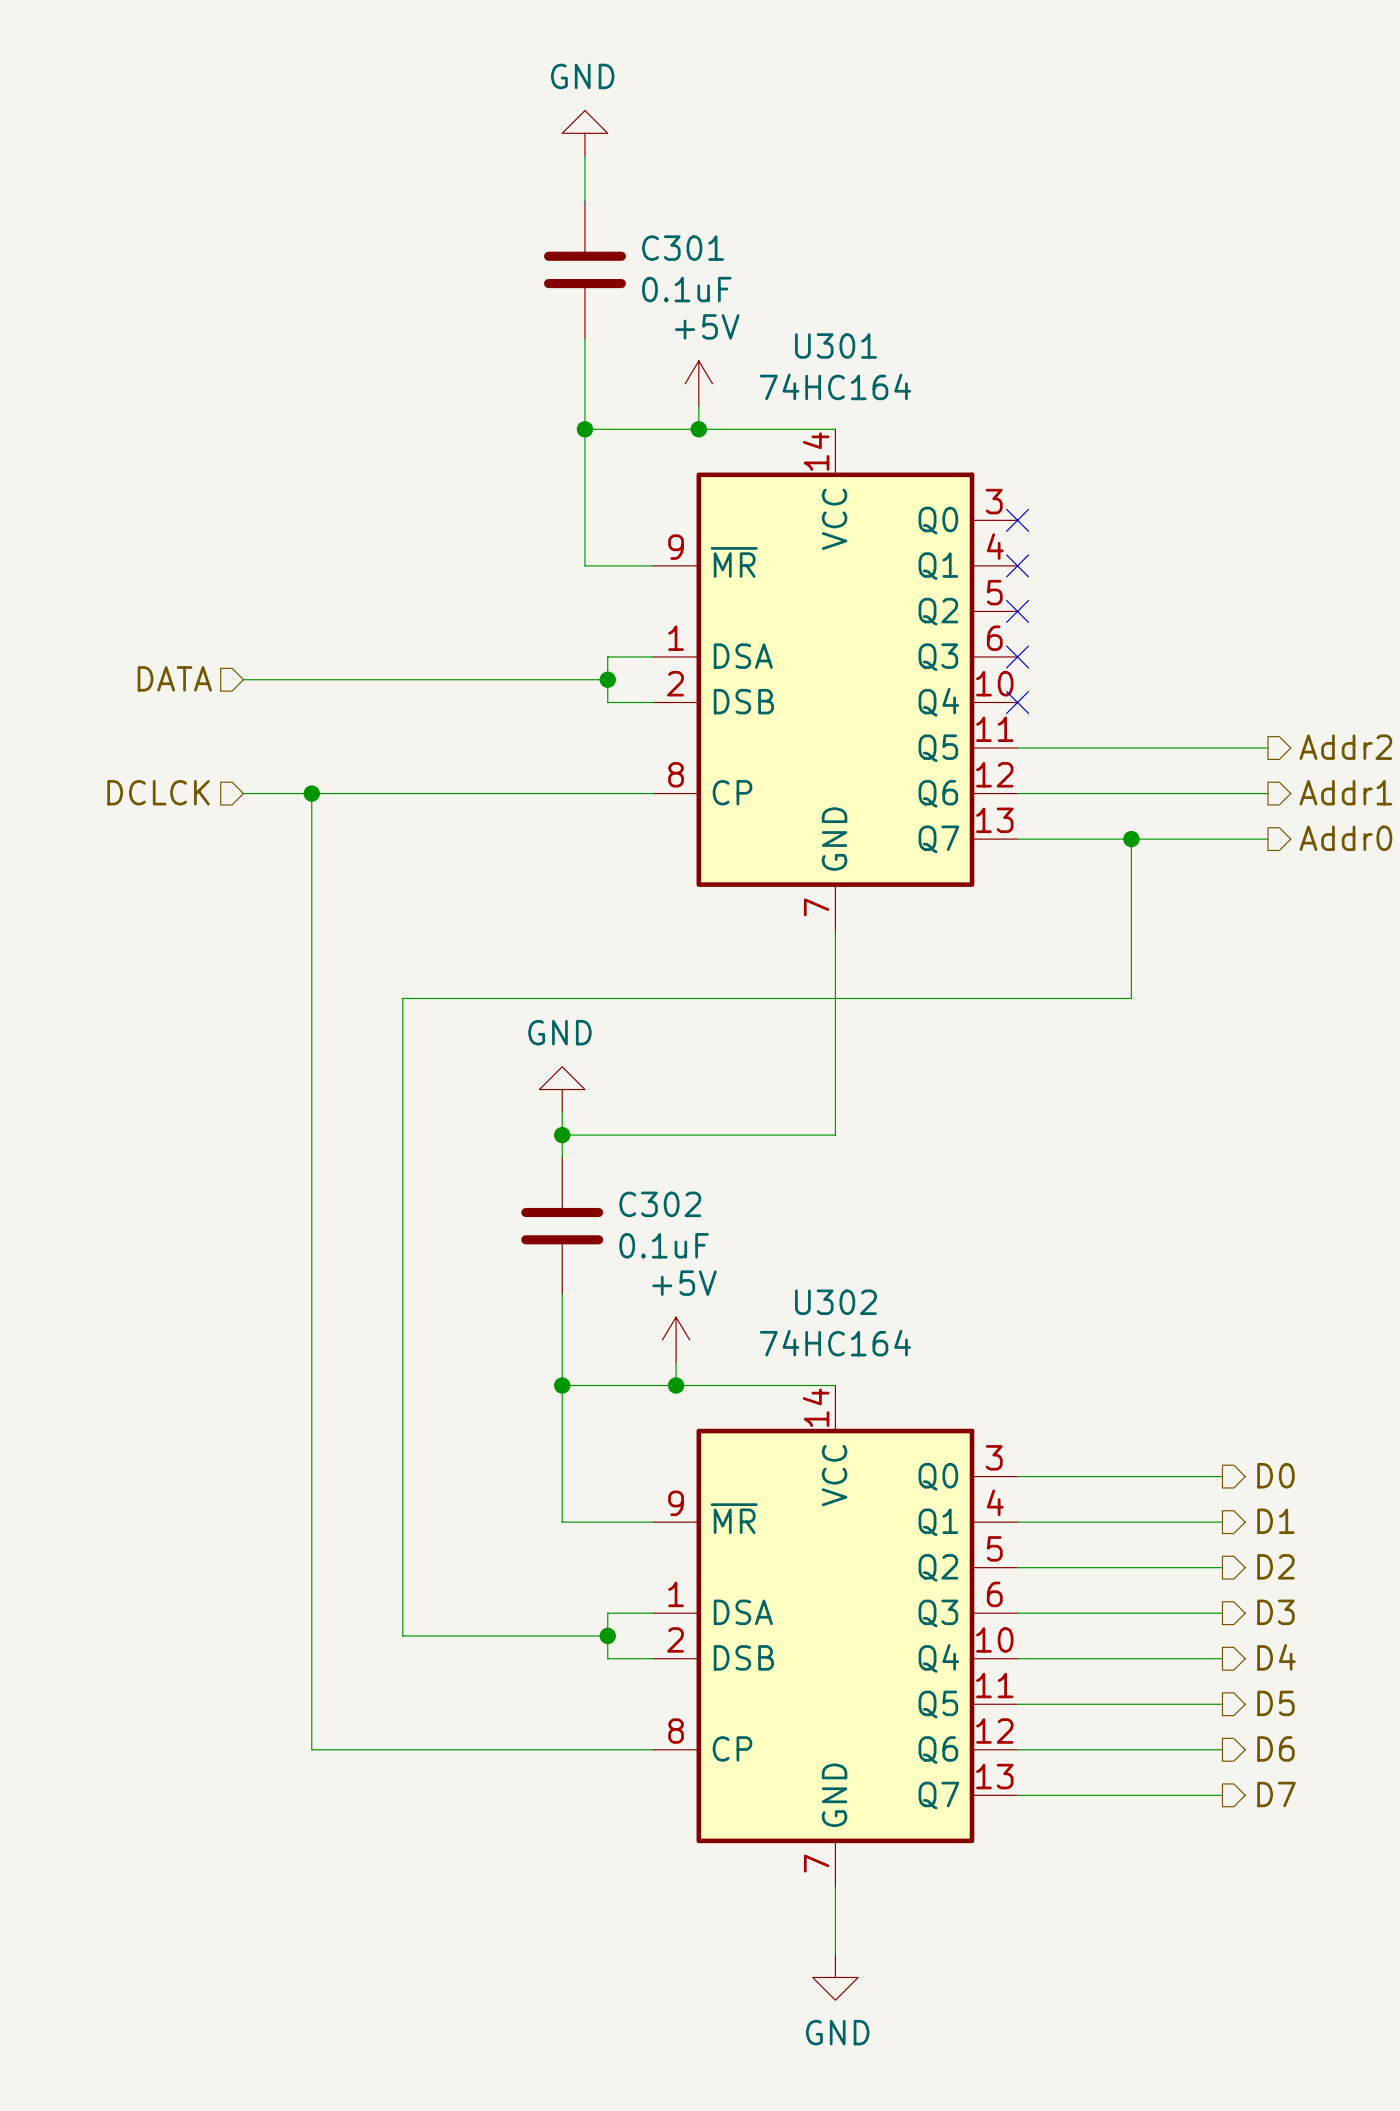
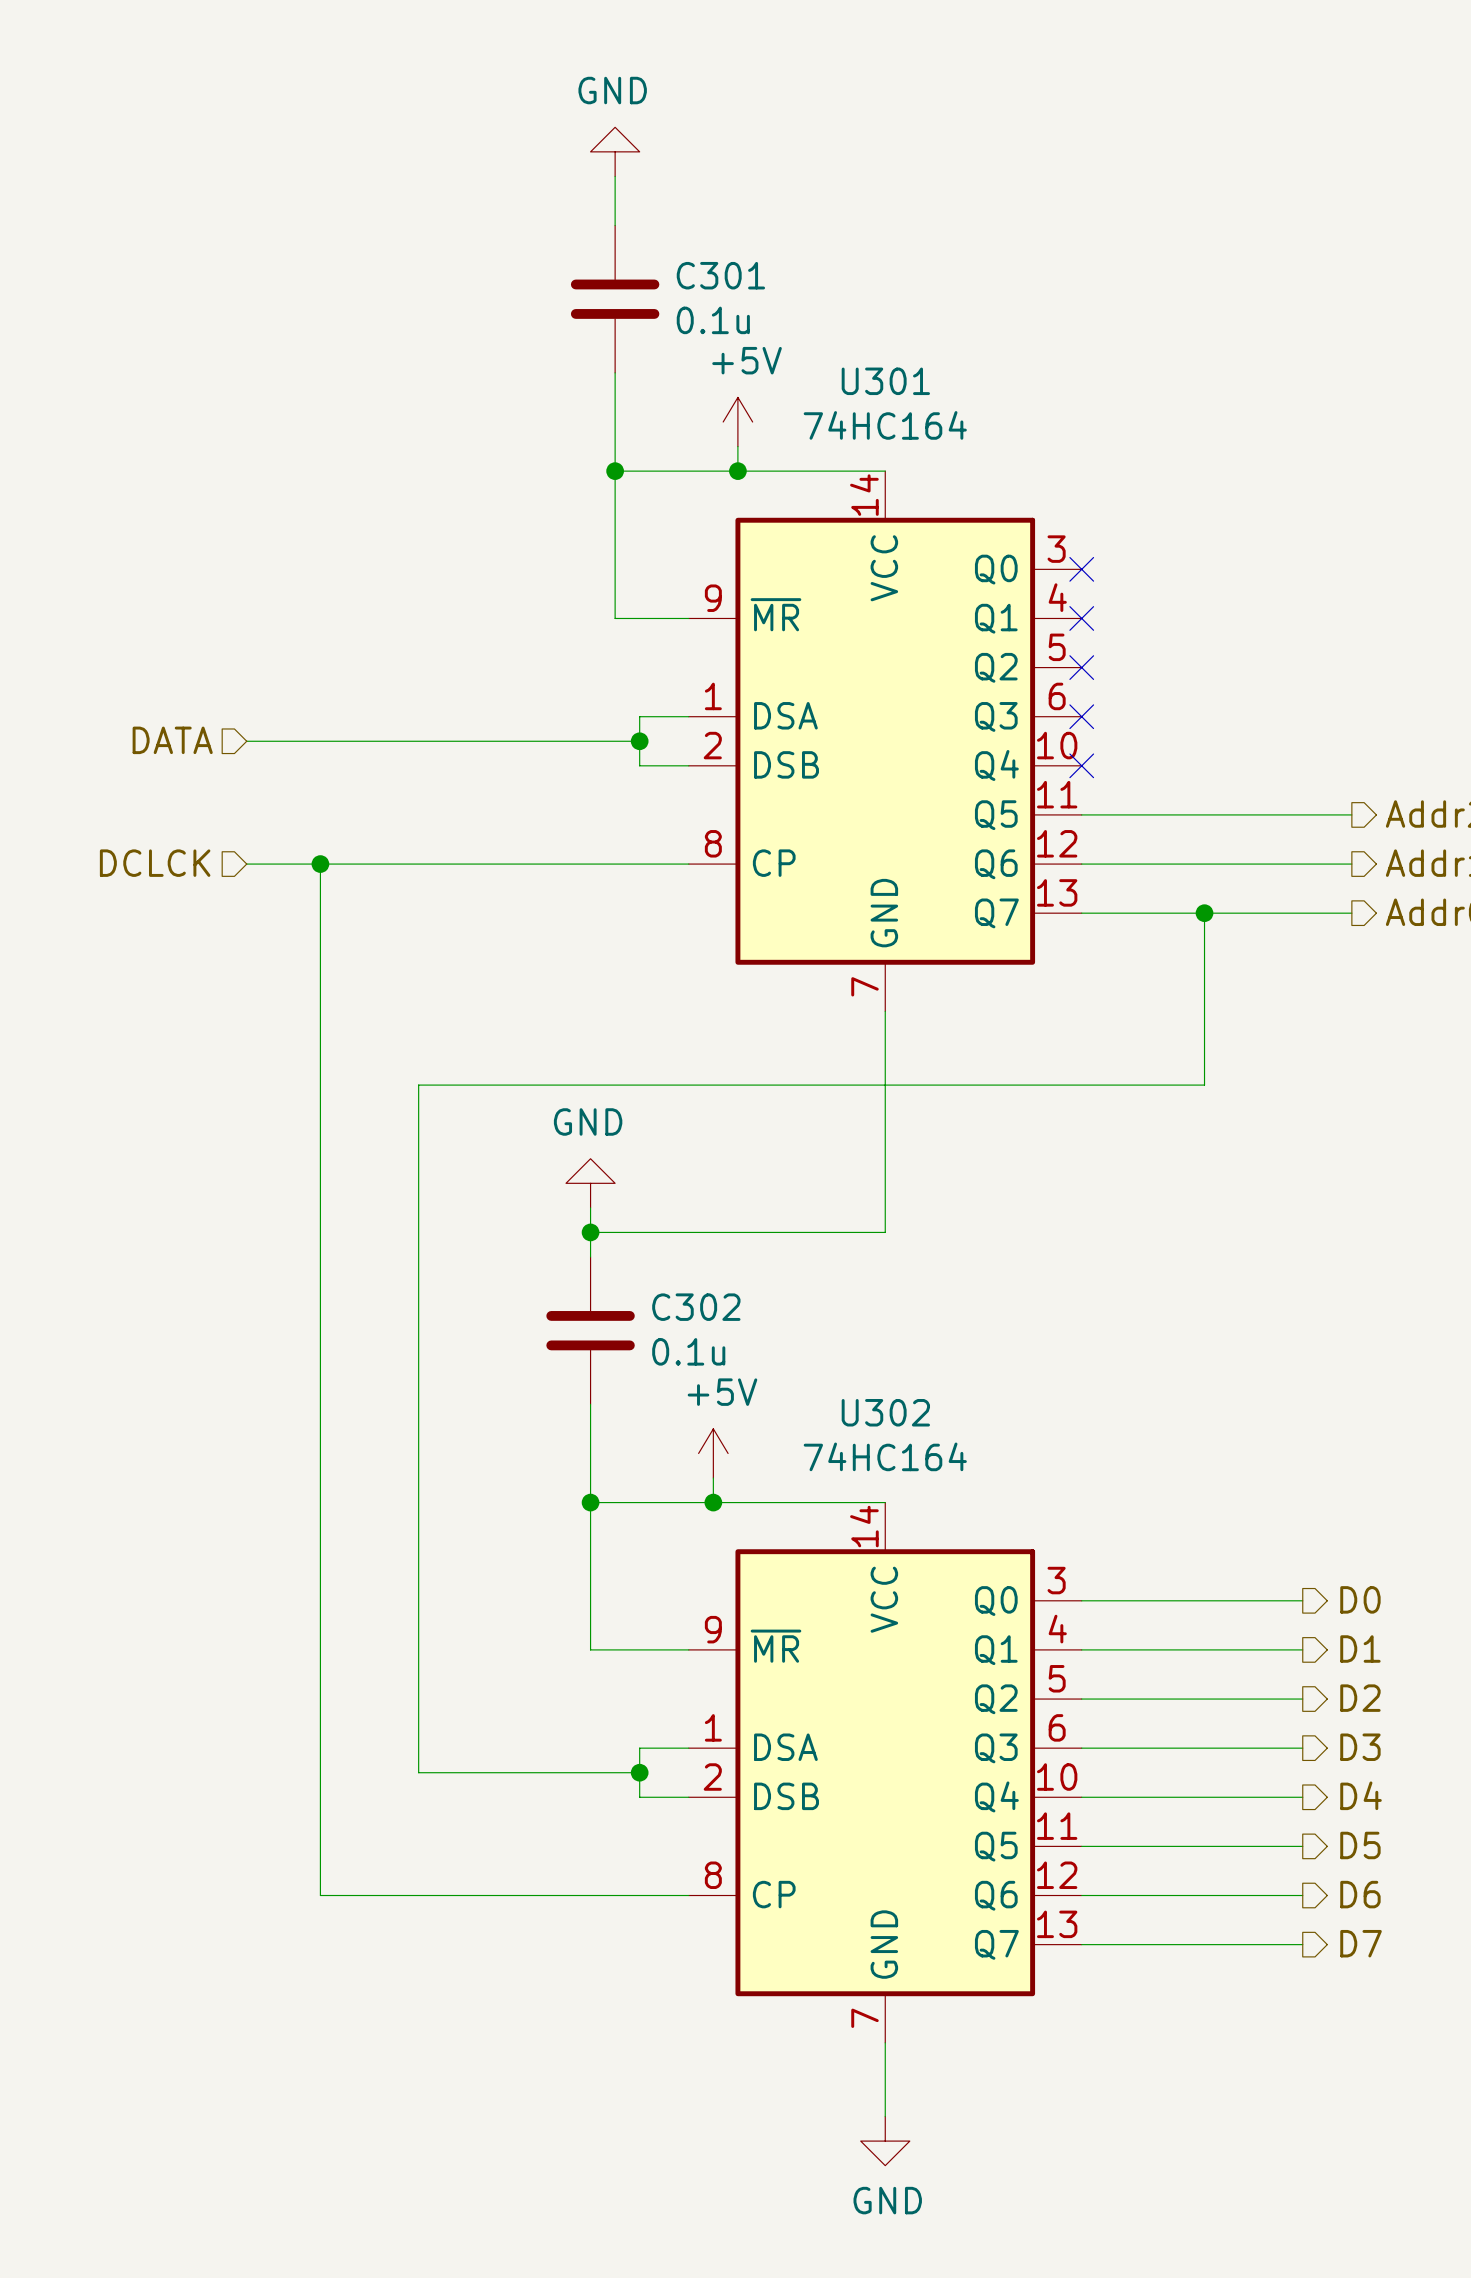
C301 value: 0.1uF (686, 289) -> 0.1u (713, 320)
C302 value: 0.1uF (664, 1245) -> 0.1u (688, 1351)

